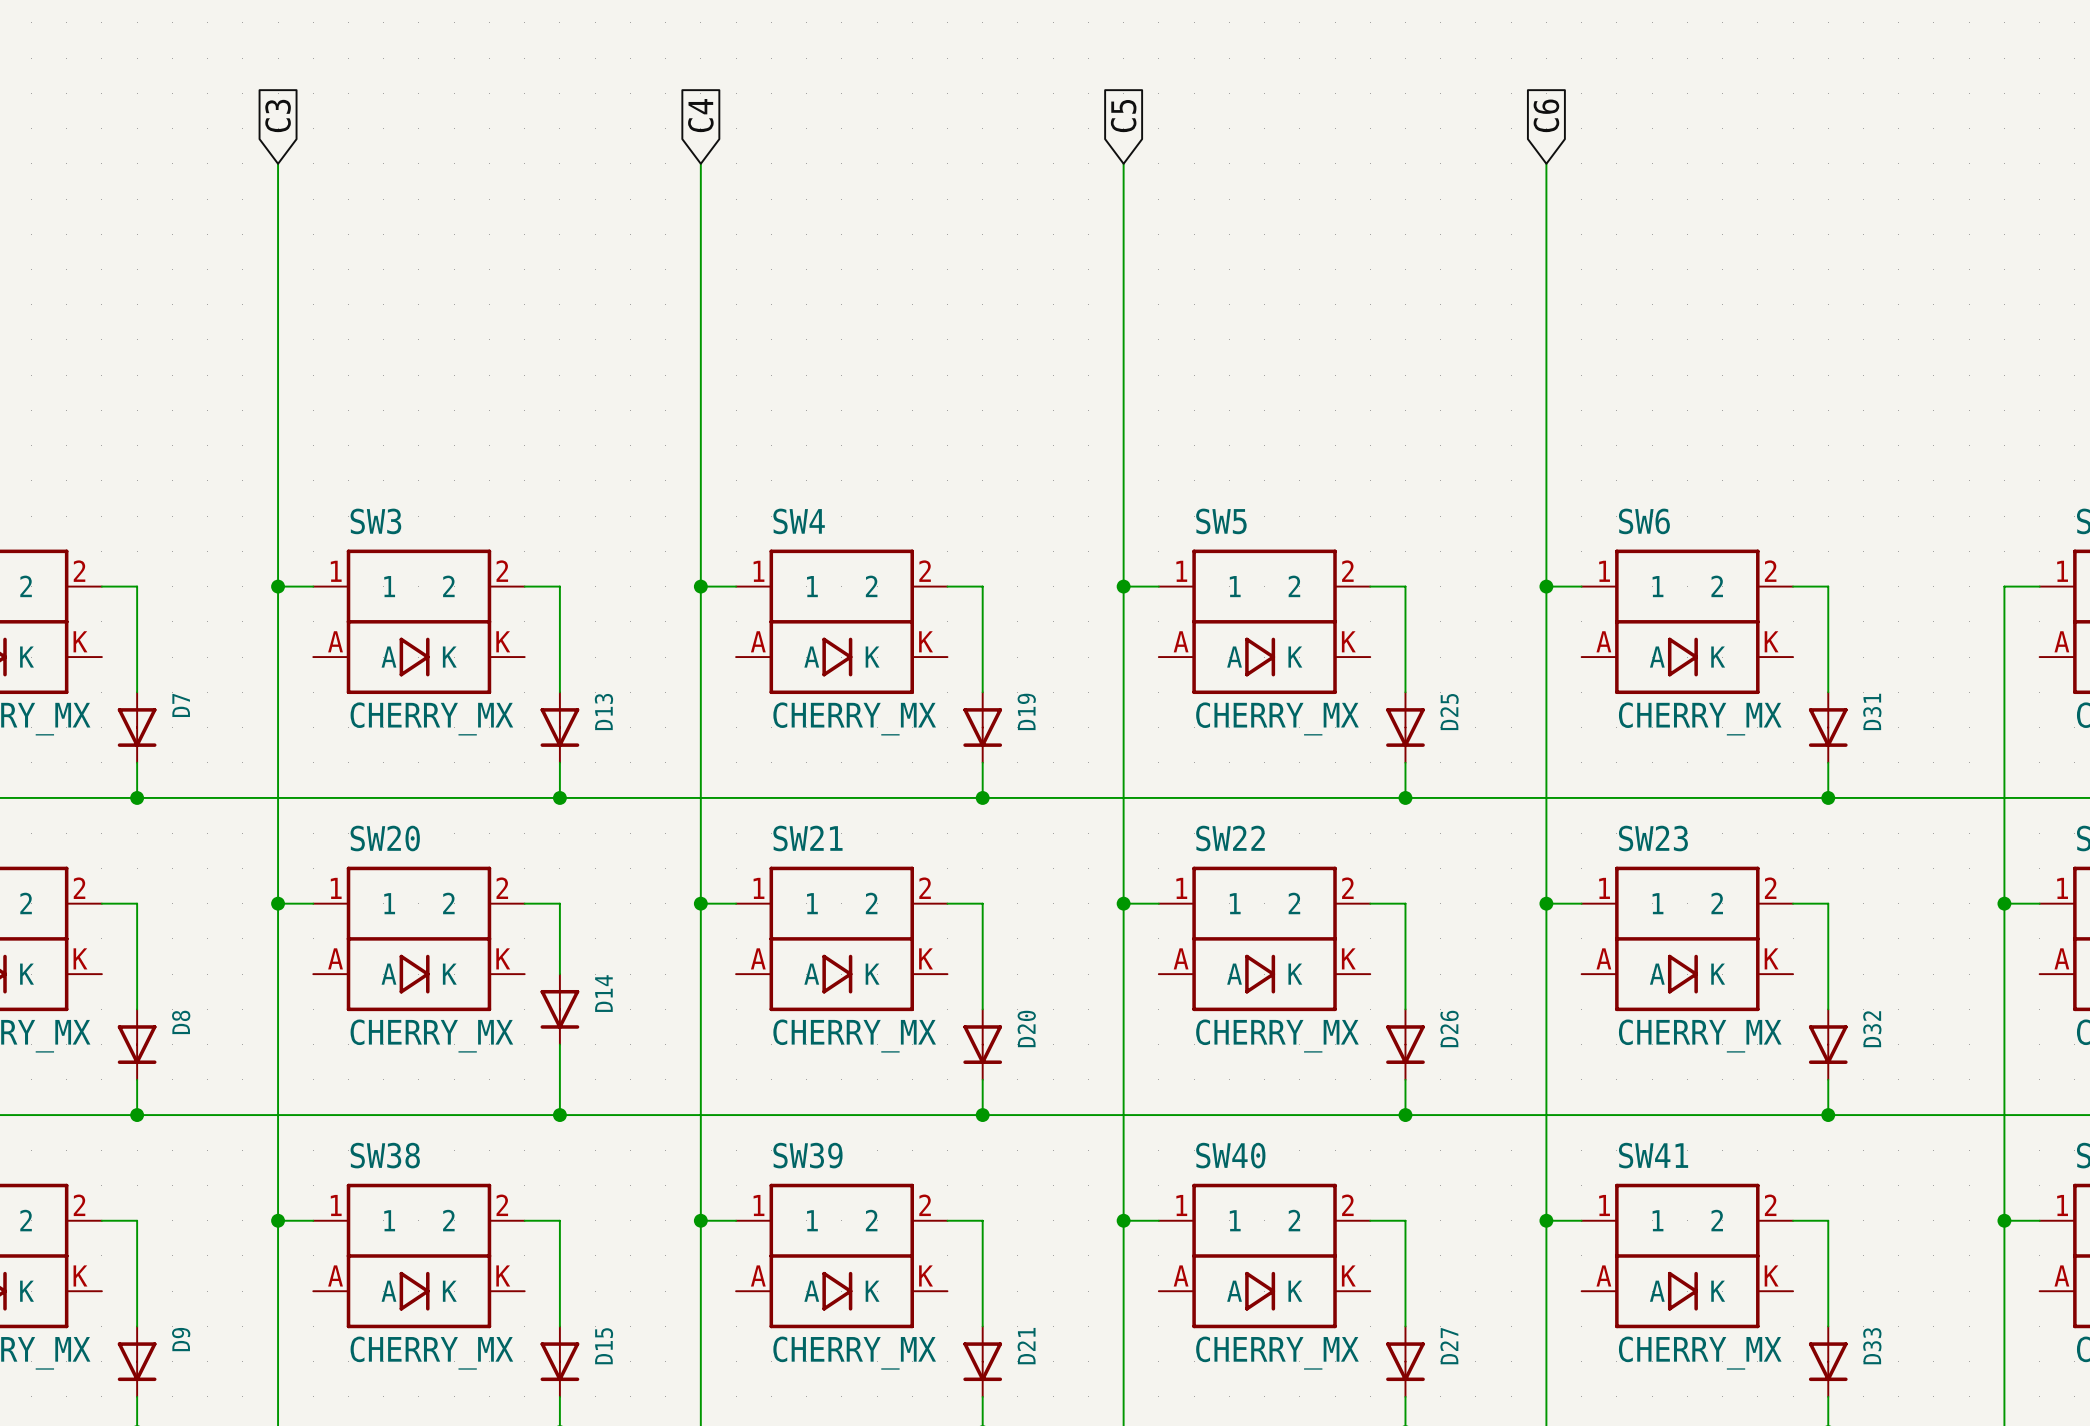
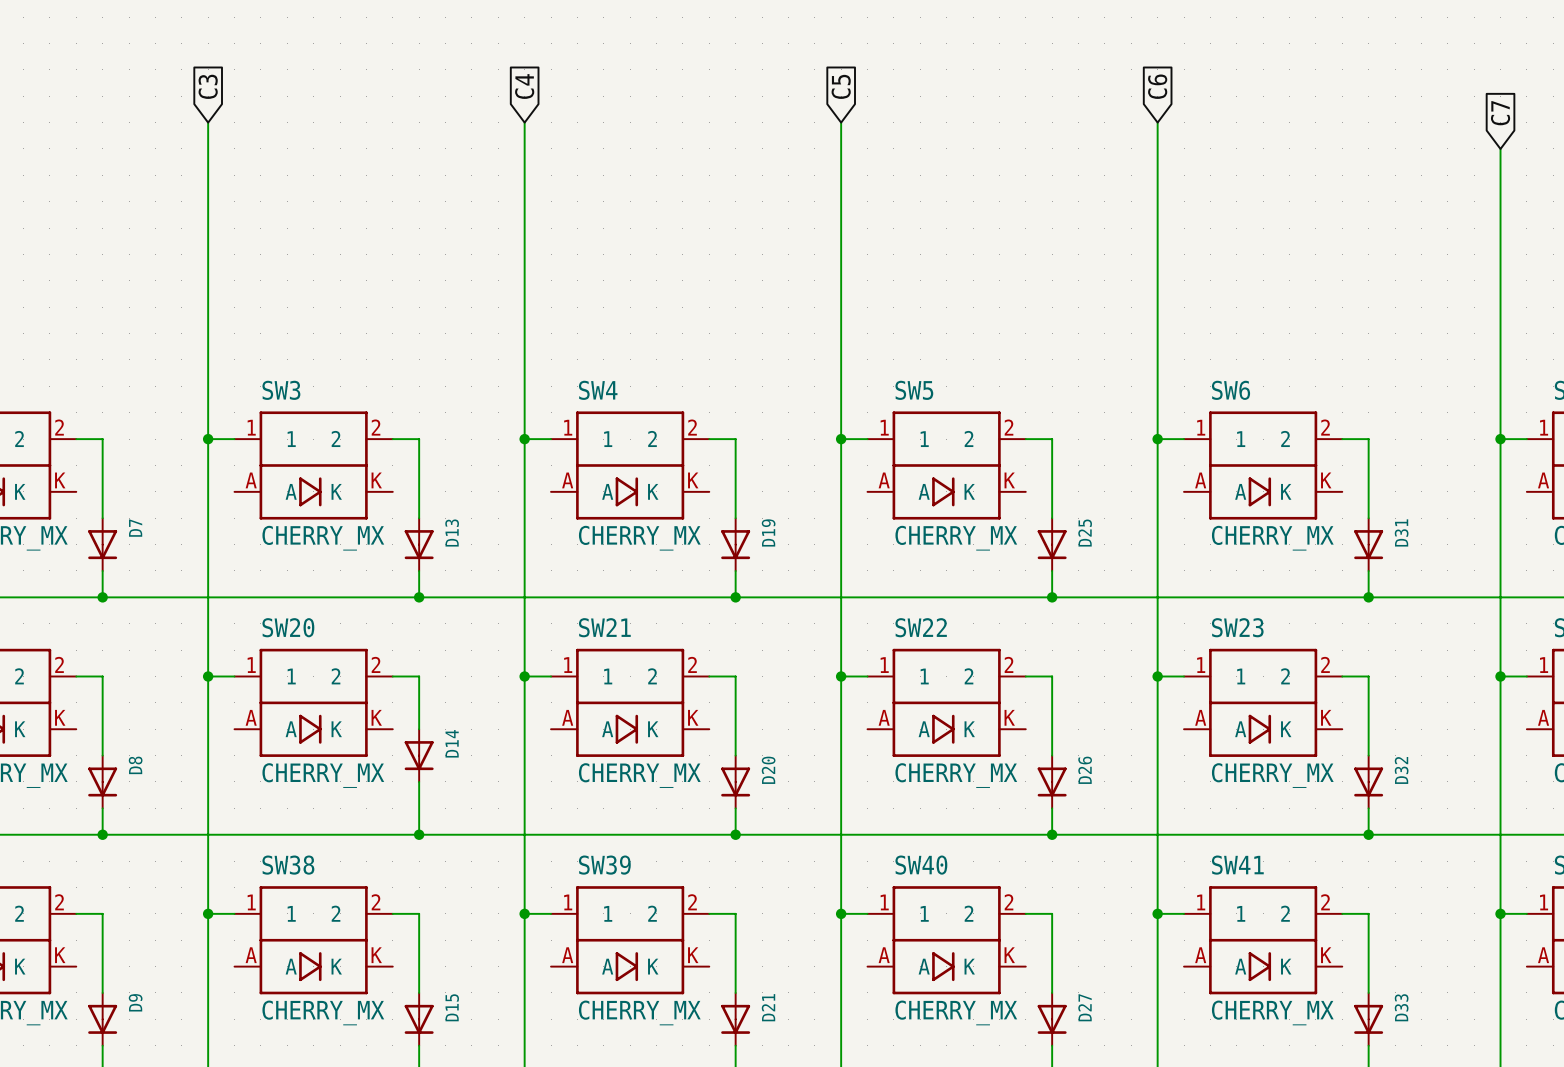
global label: none -> C7 (1500, 113)
wire: none -> (1500, 148) (1500, 439)
junction: none -> (1500, 439)

